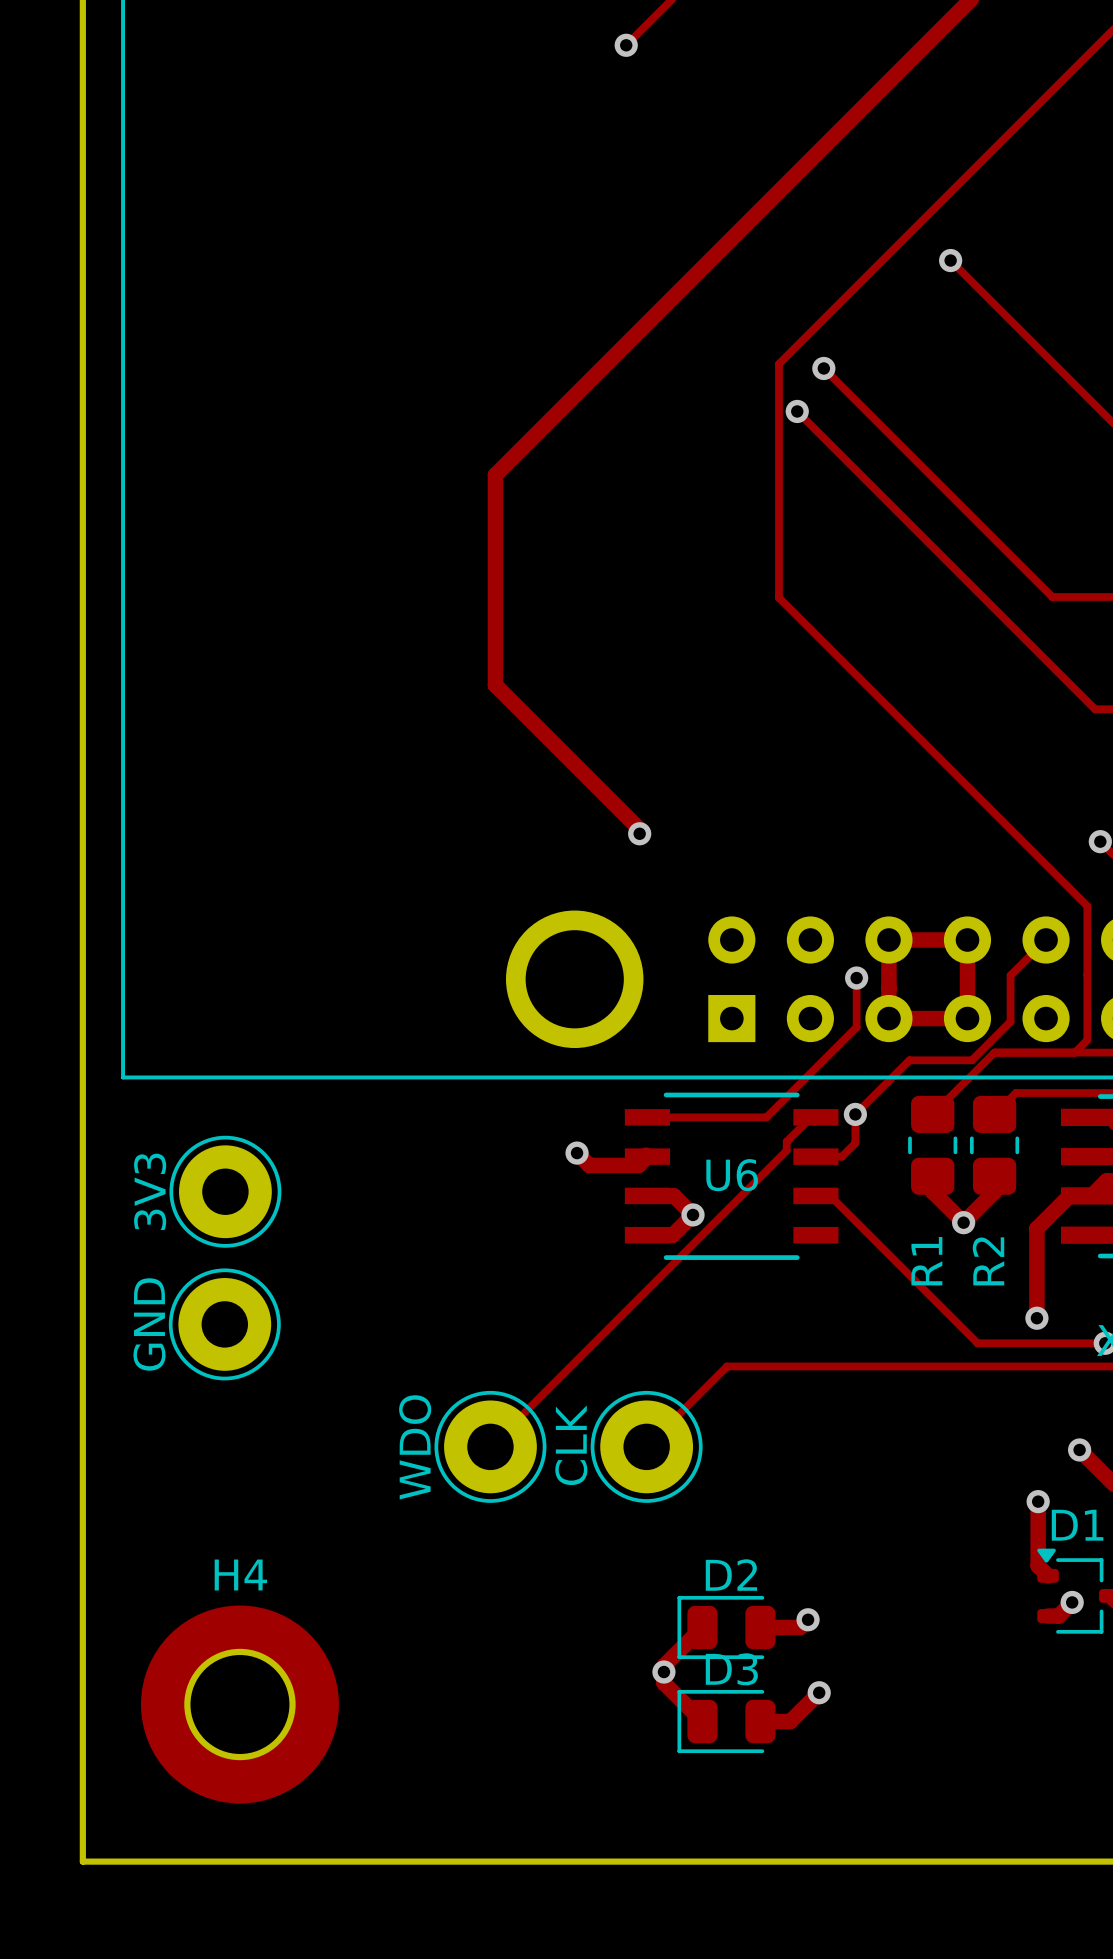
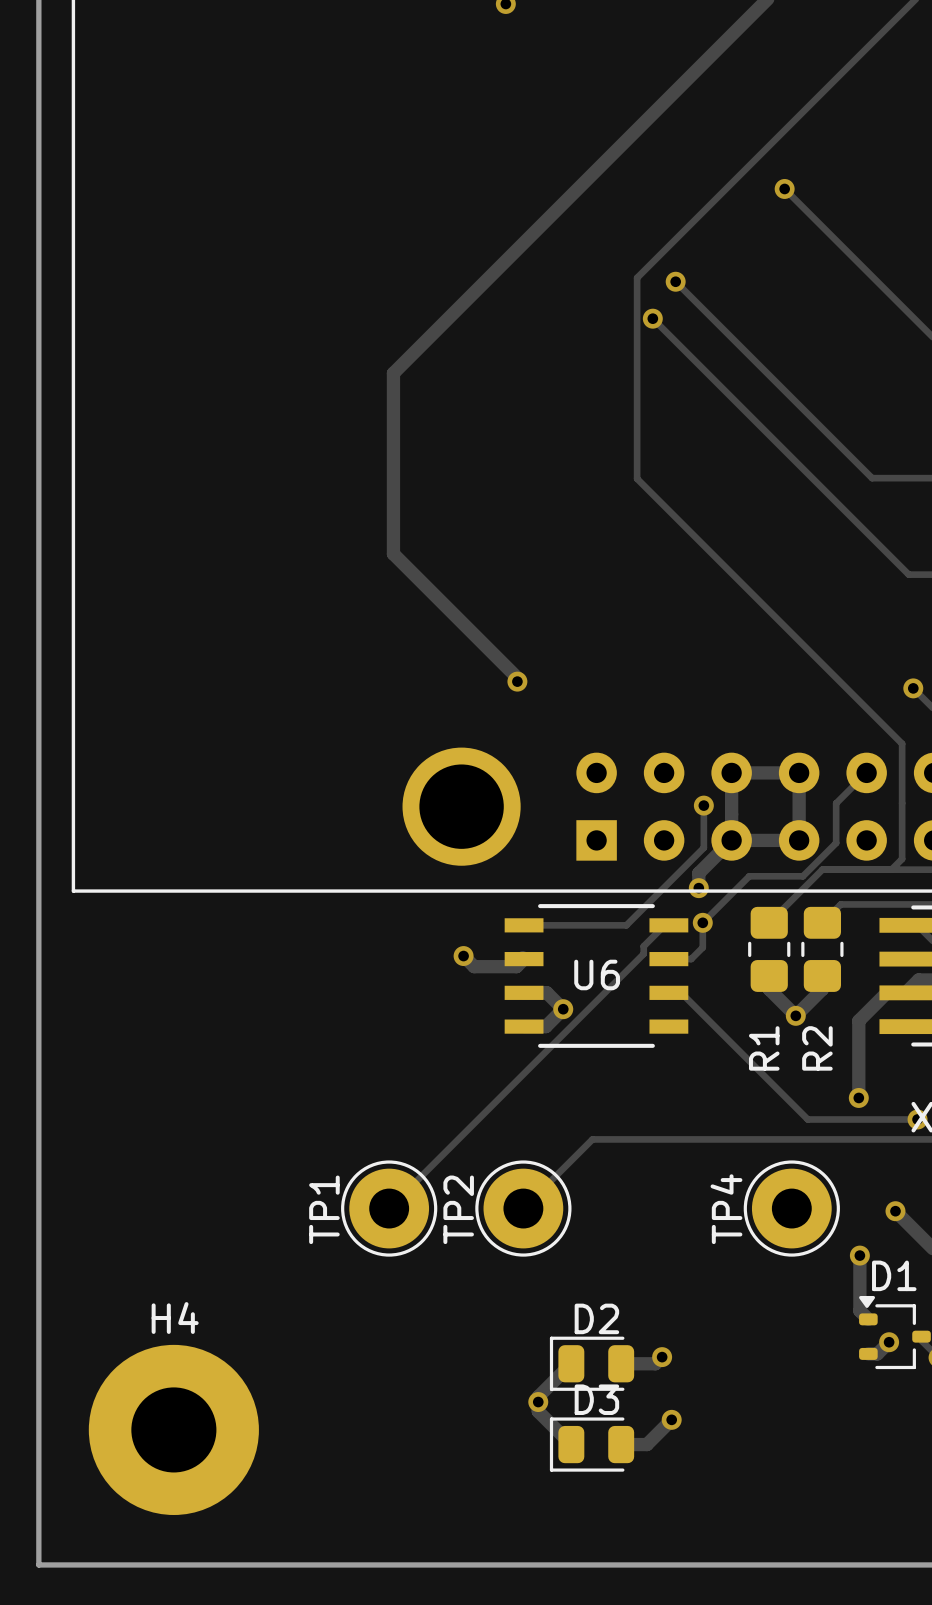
track: none -> (731, 840) (698, 873) (698, 888)
via: none -> (698, 888)
3V3: (225, 1191) -> none
GND: (224, 1324) -> none
CLK name: CLK (571, 1445) -> TP2 (458, 1209)
TP4: none -> (791, 1208)
WDO name: WDO (415, 1447) -> TP1 (324, 1209)

